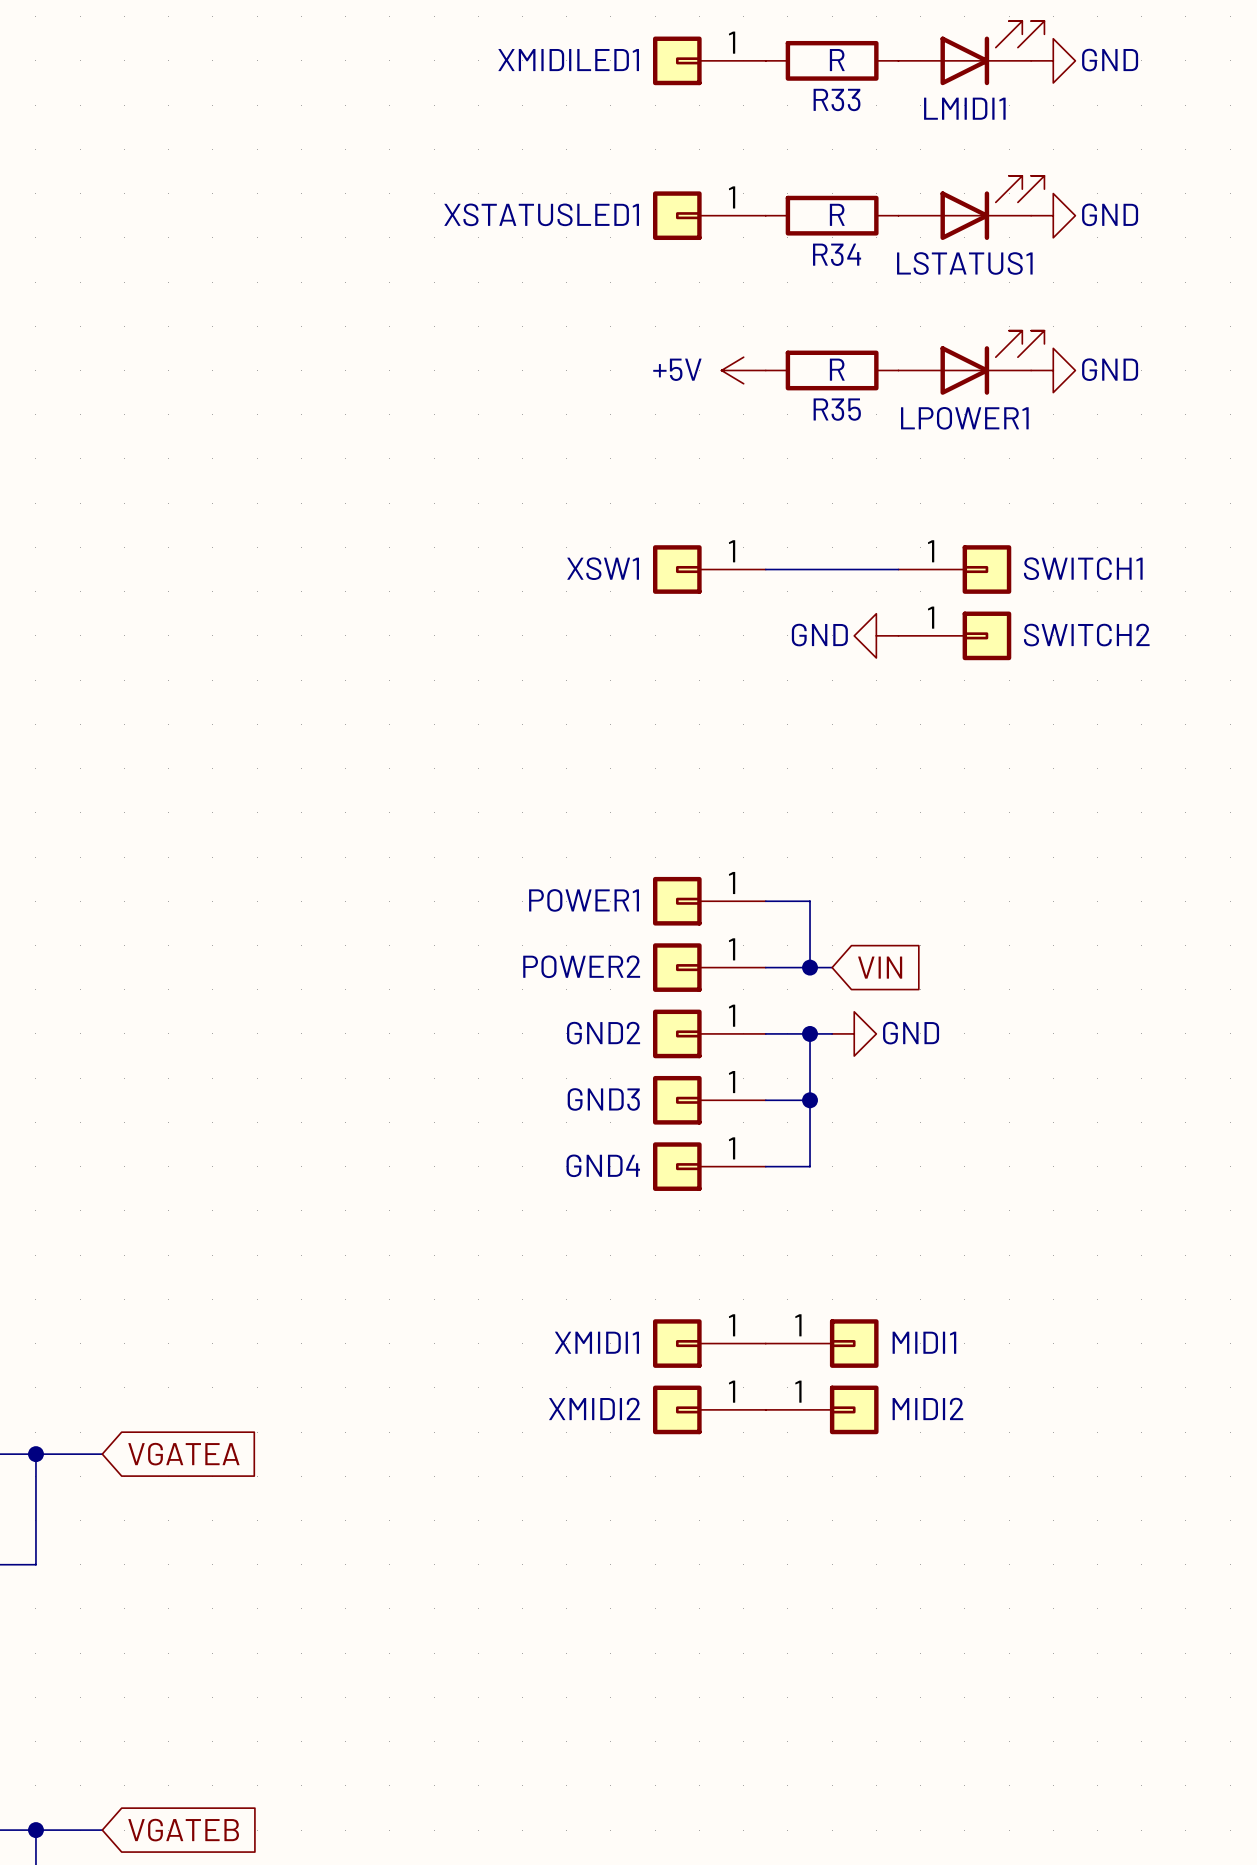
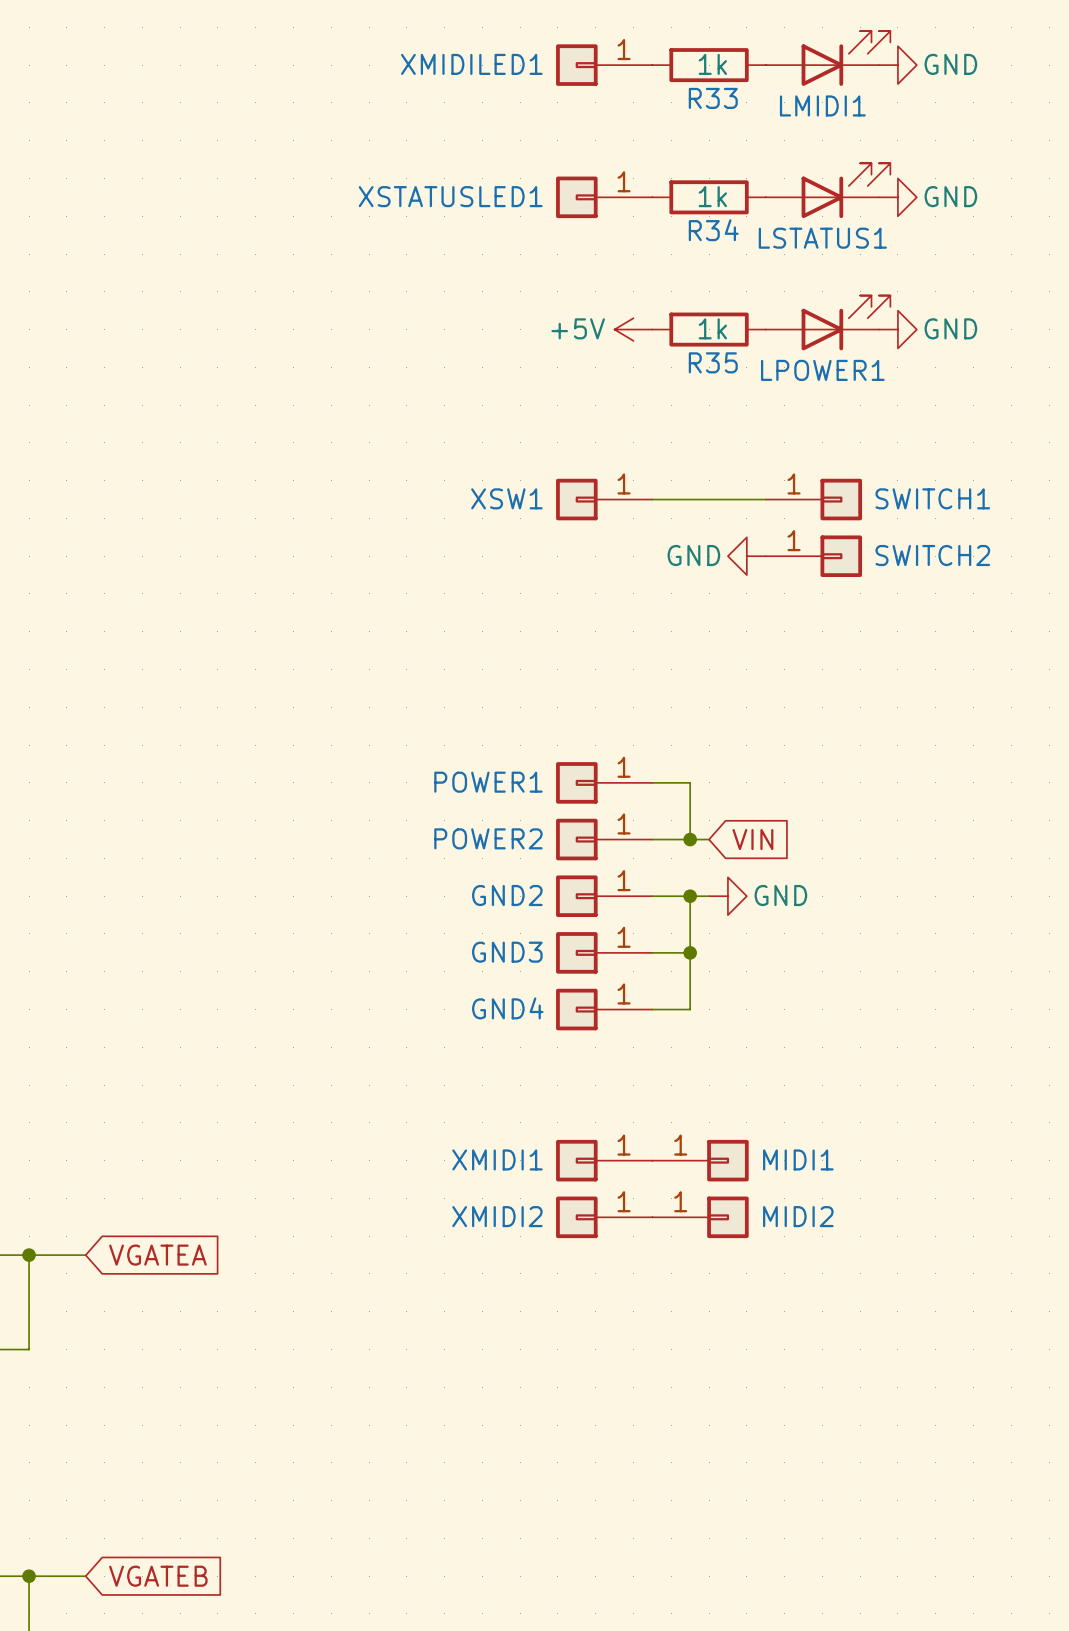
R33 value: R (837, 60) -> 1k (712, 64)
R34 value: R (837, 214) -> 1k (712, 196)
R35 value: R (837, 369) -> 1k (712, 328)

